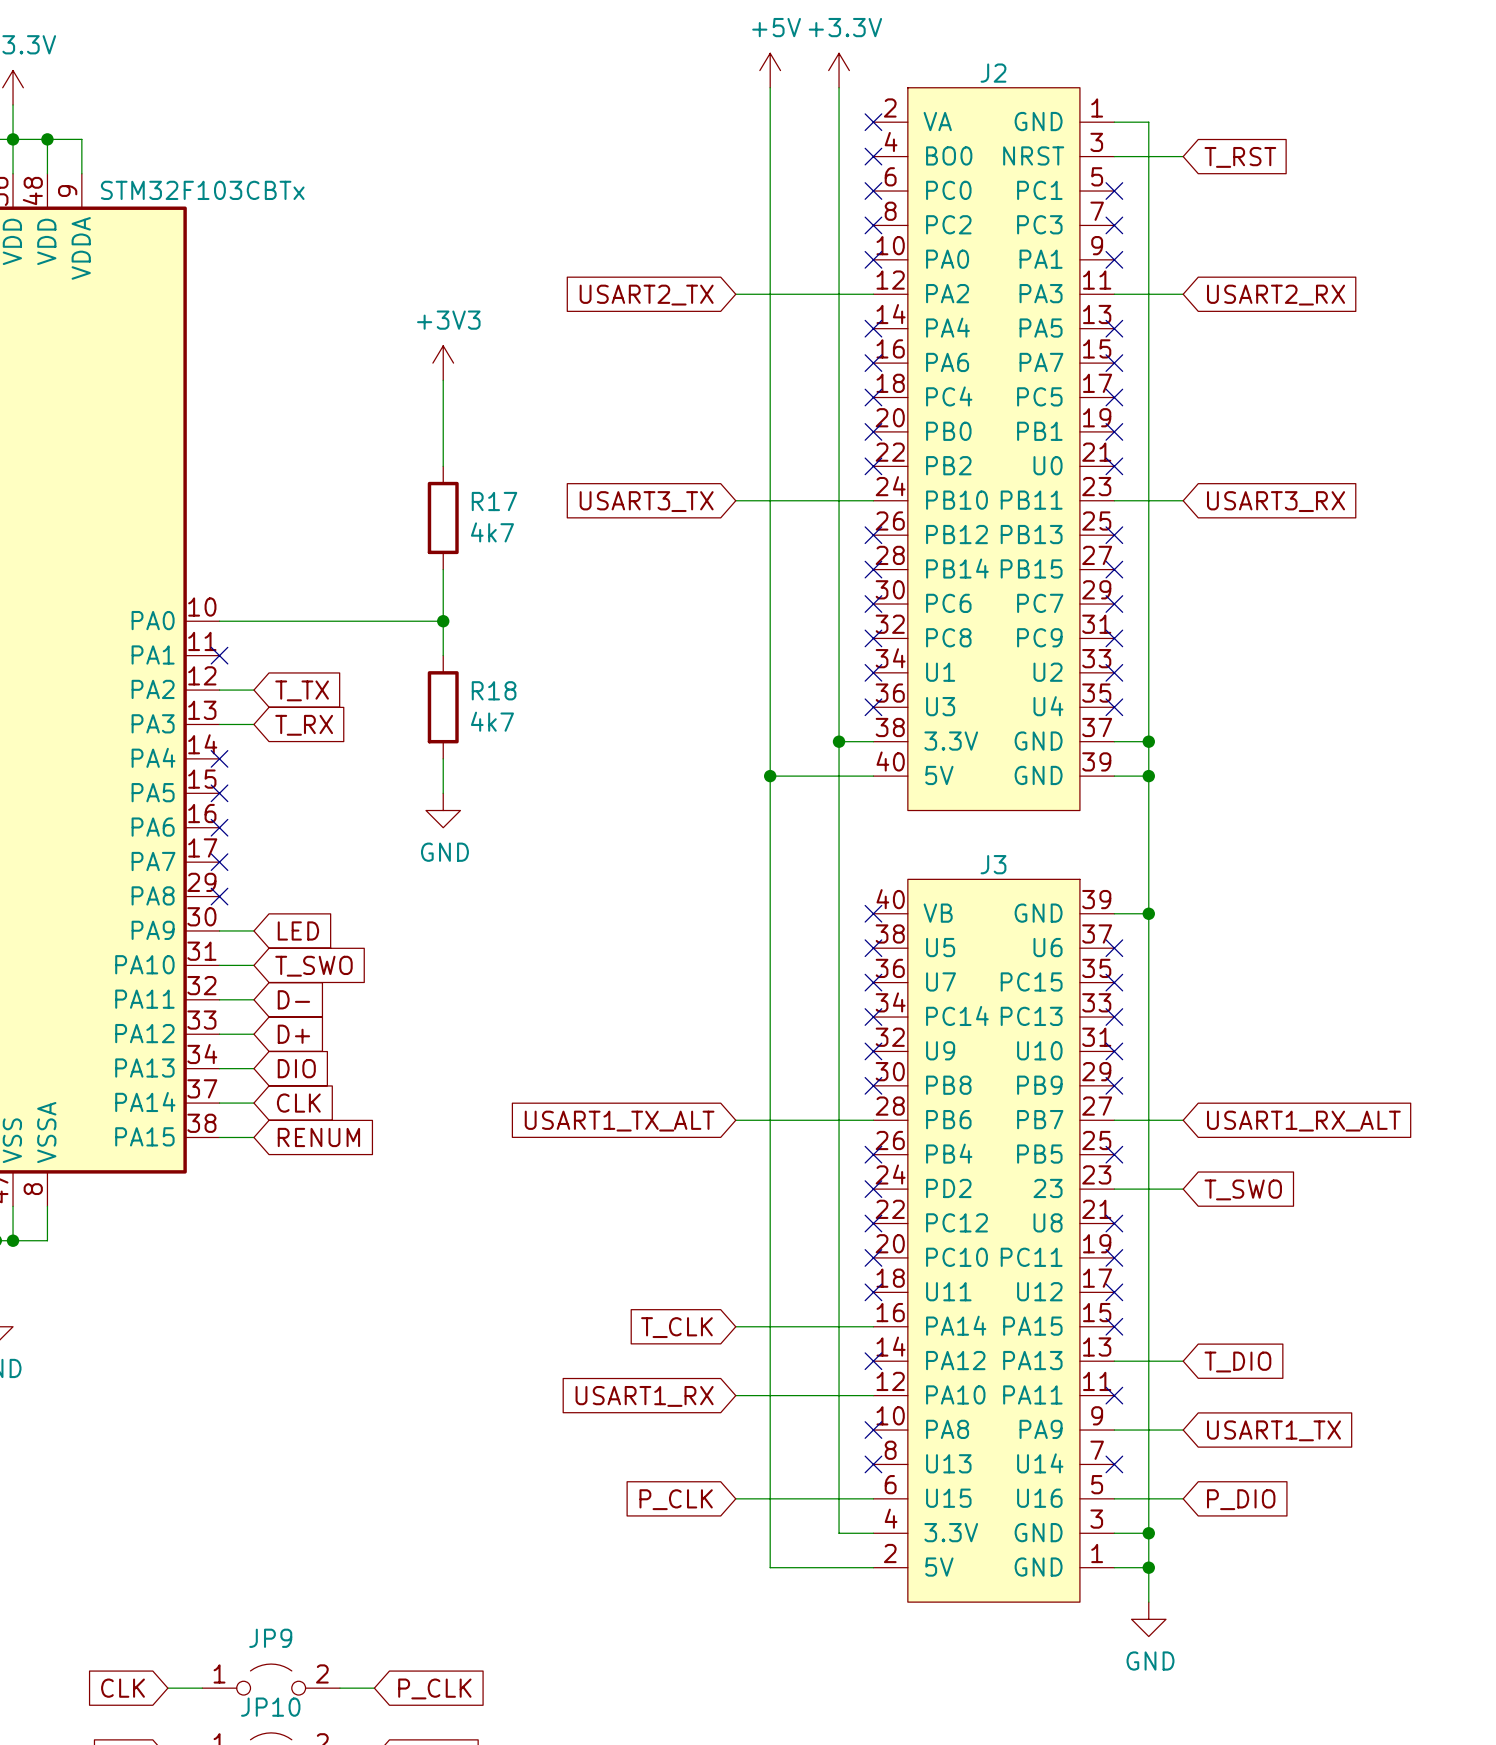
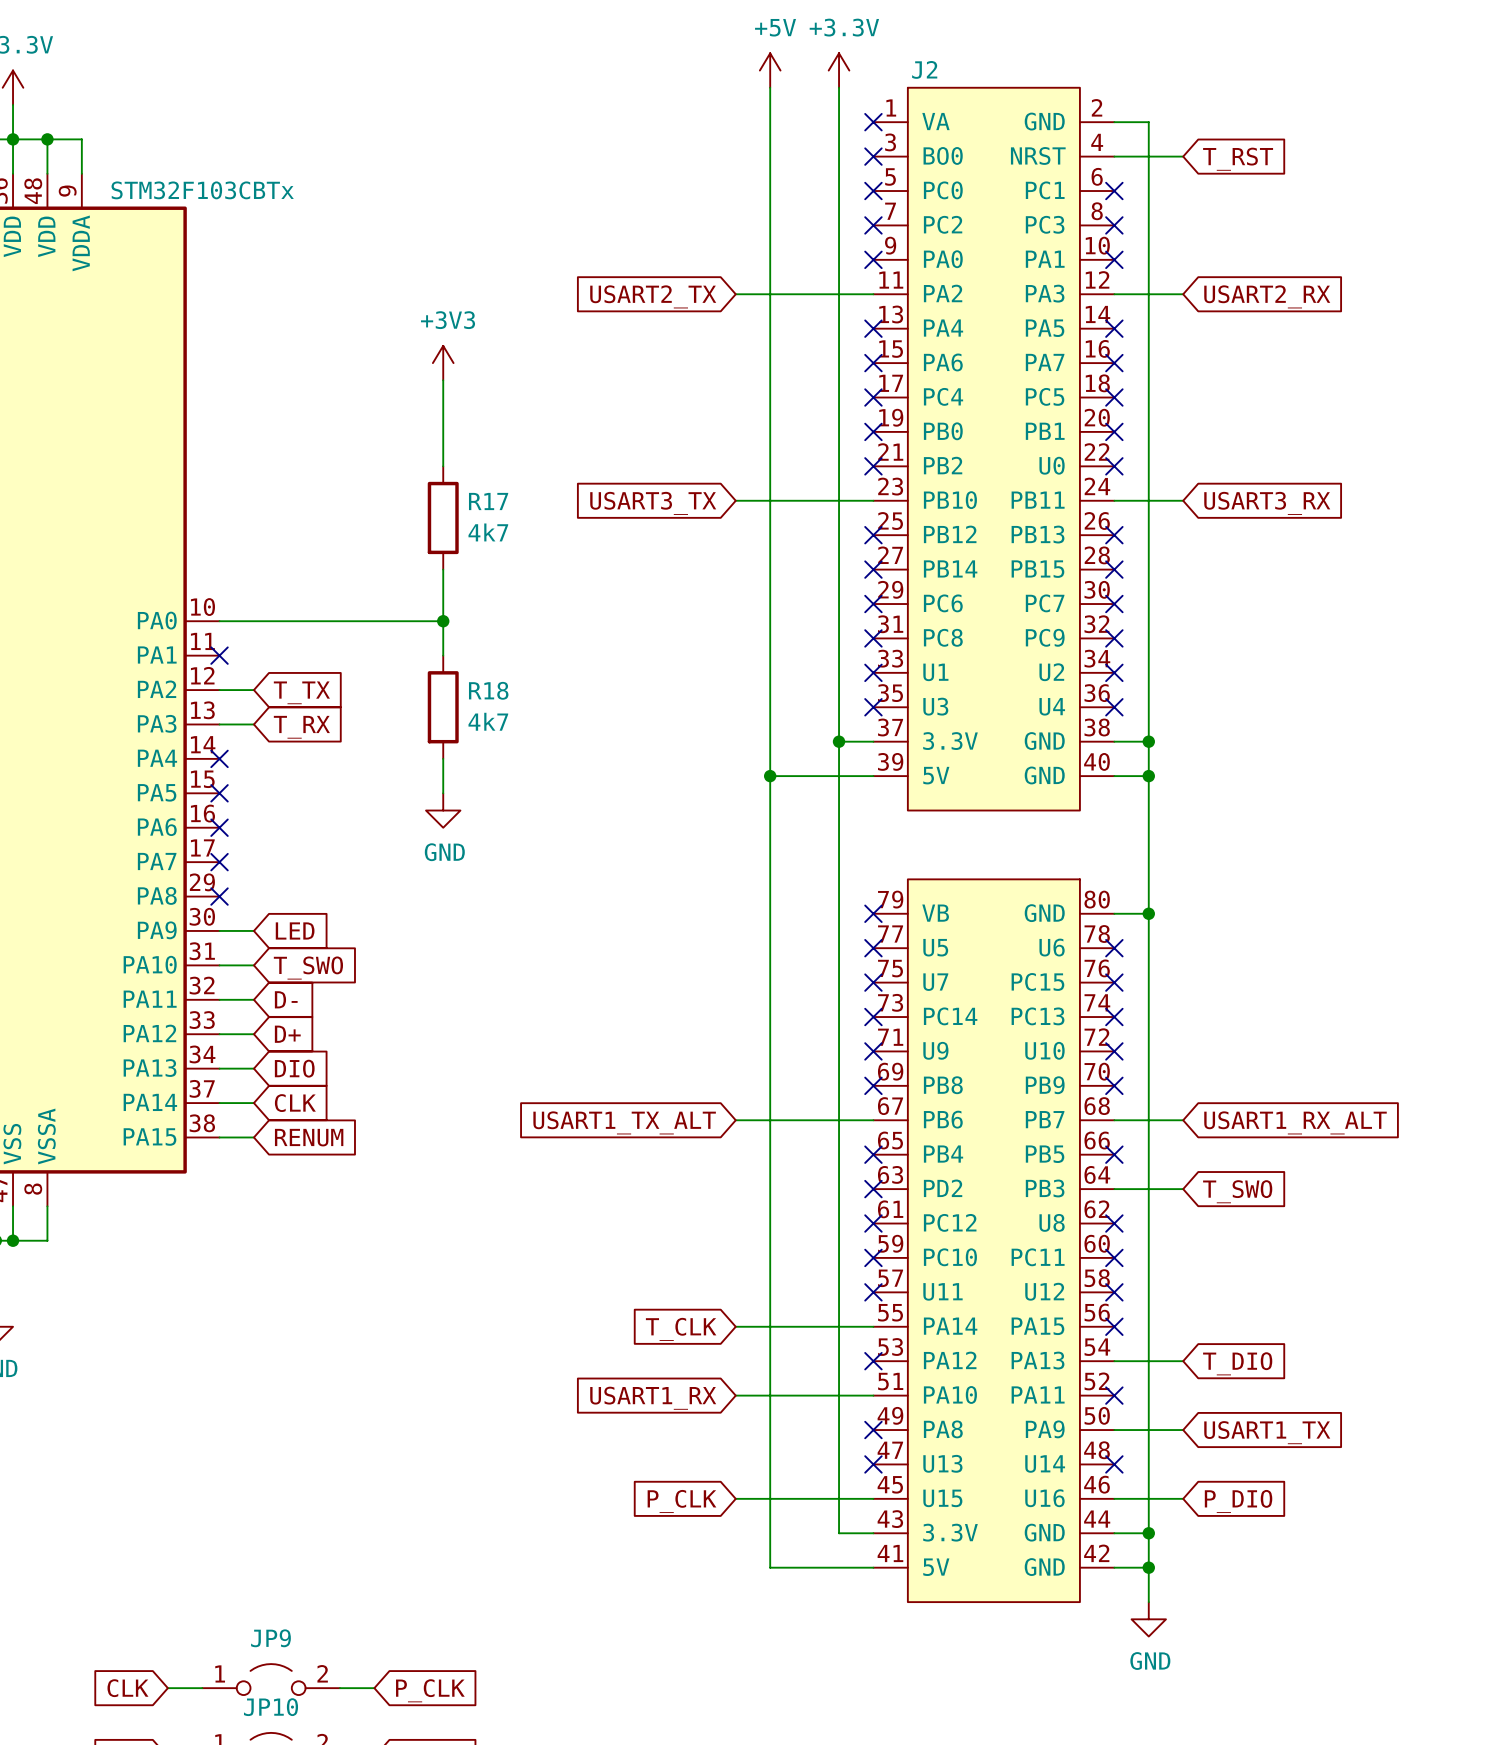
J2 name position: J2 (993, 73) -> J2 (924, 69)
J2 symbol: [873, 87, 1115, 811] -> [873, 87, 1115, 1603]
J3: (993, 1240) -> none

